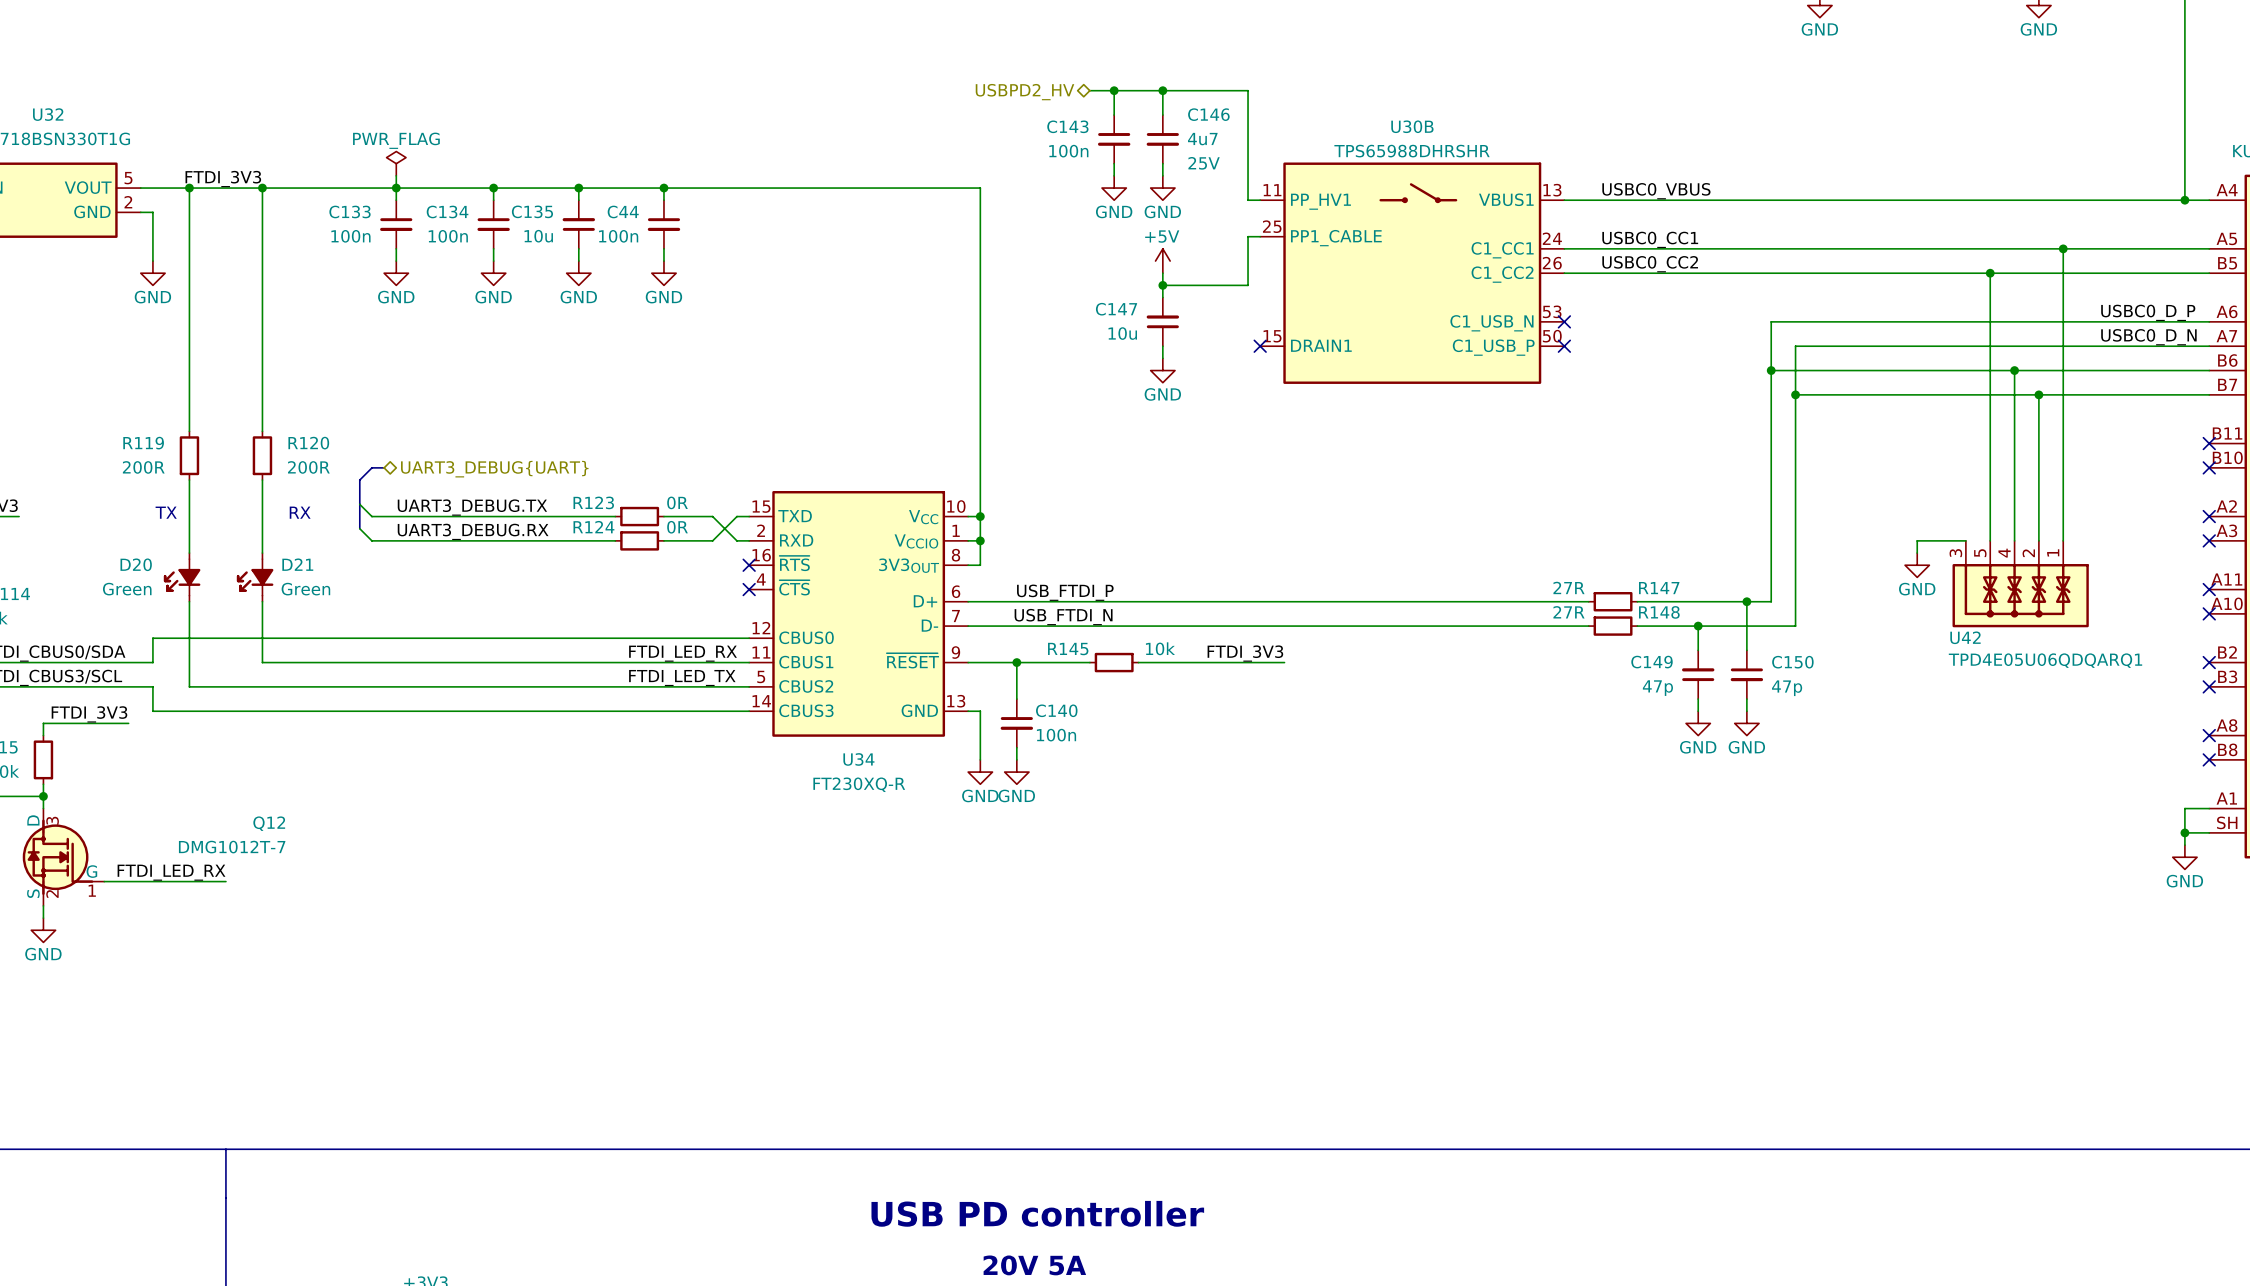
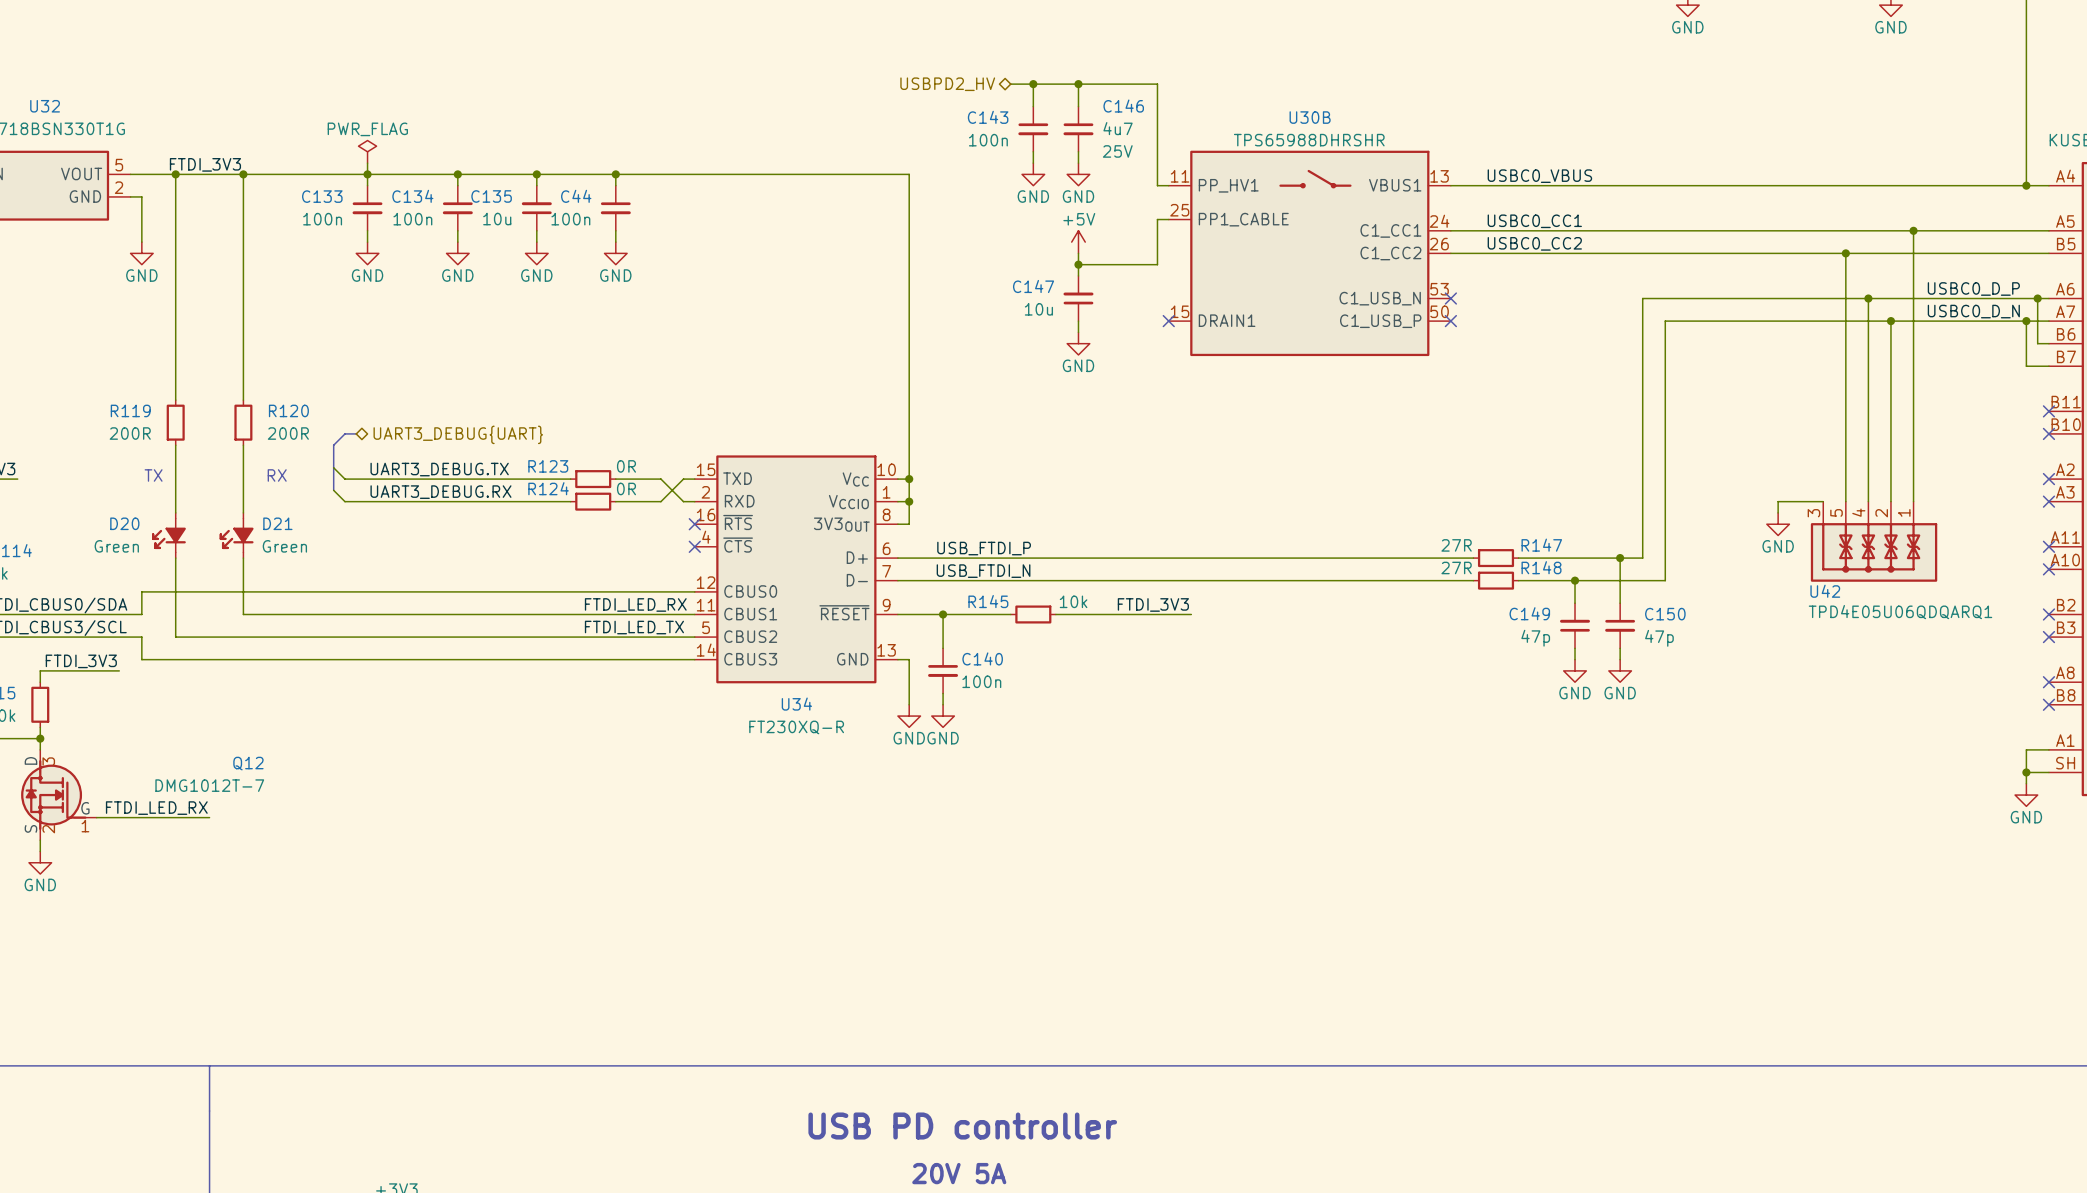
label position: USBC0_D_P (2148, 312) -> USBC0_D_P (1973, 288)
wire: none -> (1868, 298) (1868, 343)
junction: none -> (1868, 298)
junction: none -> (2037, 298)
label position: USBC0_D_N (2148, 337) -> USBC0_D_N (1973, 311)
wire: none -> (1890, 321) (1890, 366)
junction: none -> (1890, 321)
junction: none -> (2026, 321)
wire: (1771, 370) (2197, 370) -> (2037, 298) (2037, 343)
junction: (1771, 370) -> none
junction: (2014, 370) -> none
wire: (1795, 394) (2184, 394) -> (2026, 321) (2026, 366)
junction: (1795, 394) -> none
junction: (2038, 394) -> none

